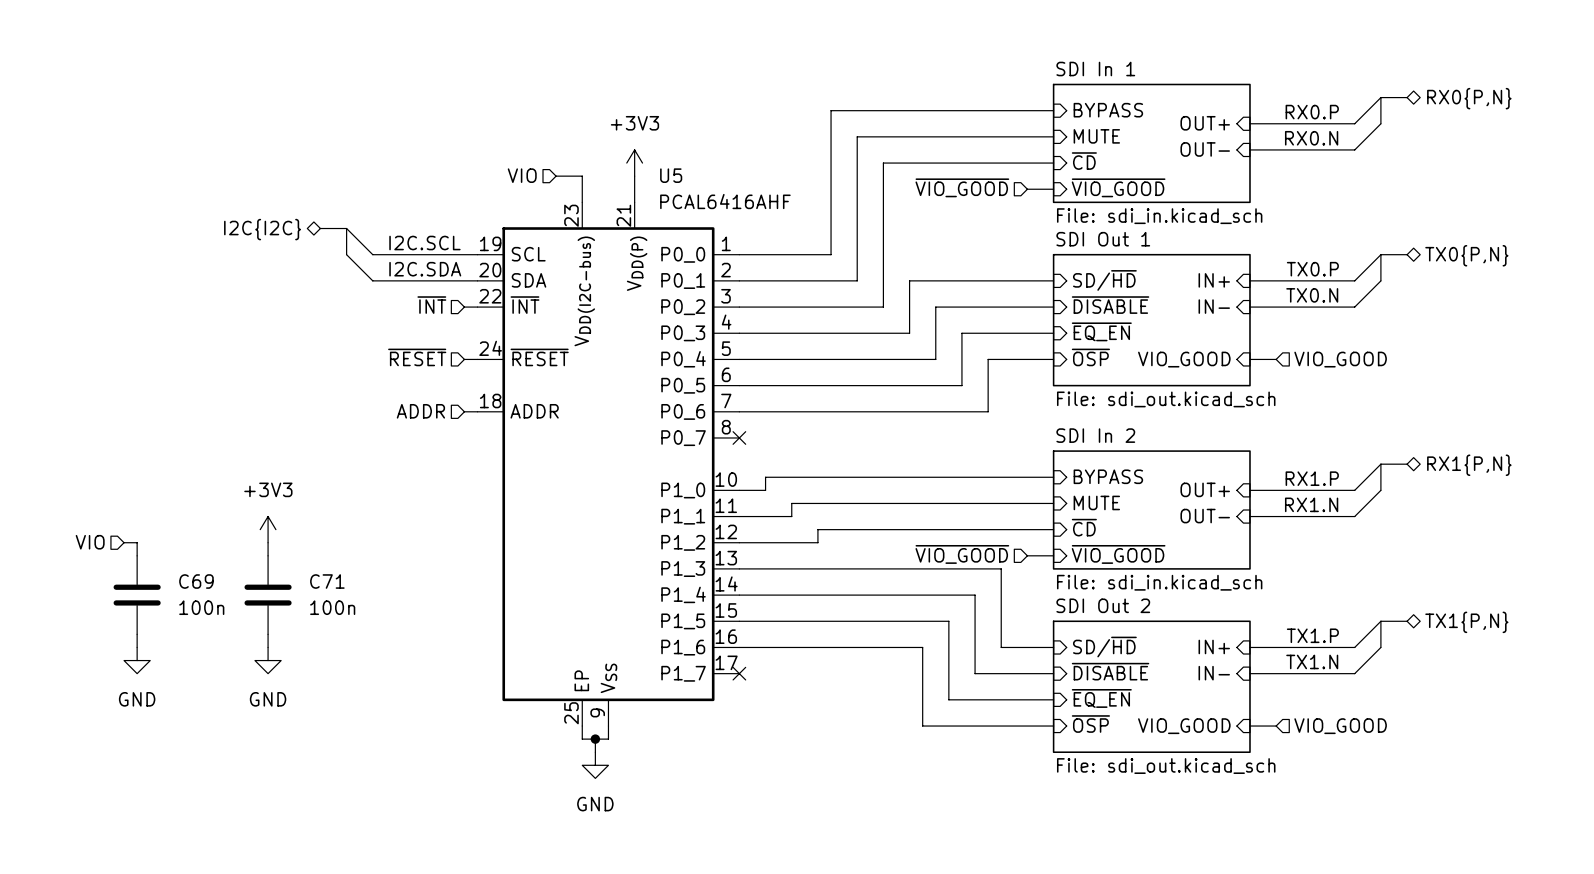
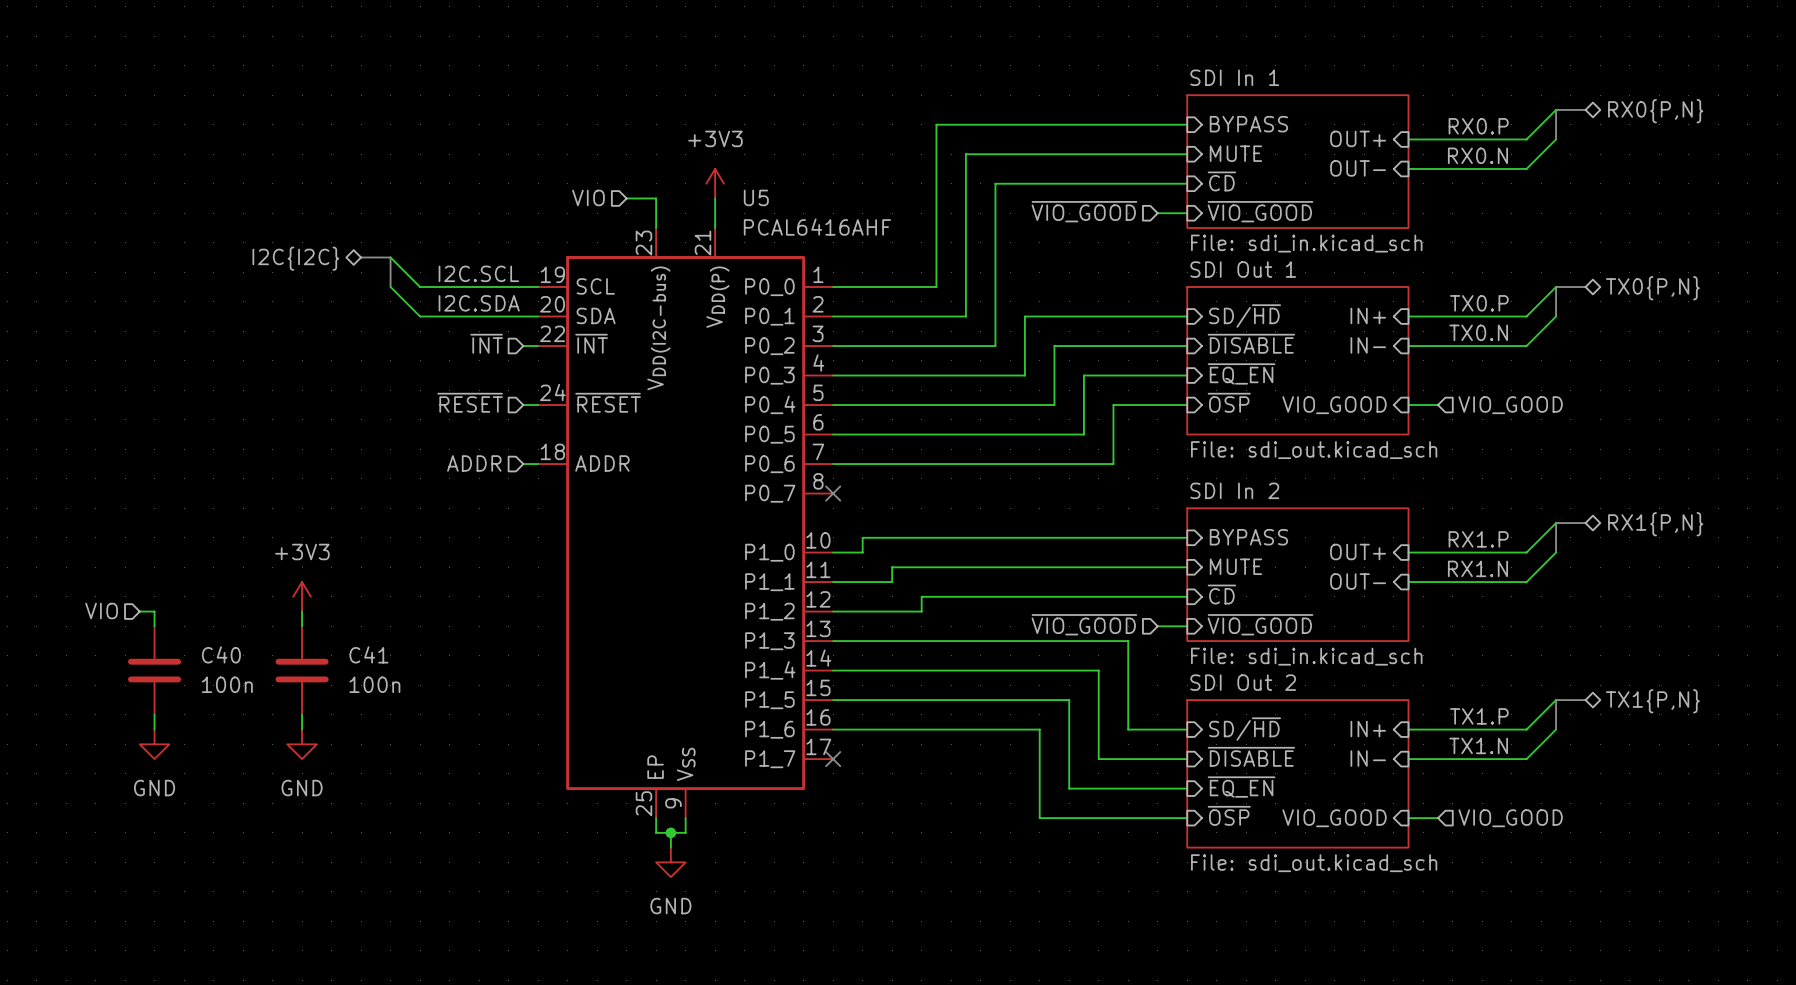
C69 name: C69 (196, 581) -> C40 (221, 654)
C71 name: C71 (327, 581) -> C41 (368, 654)

